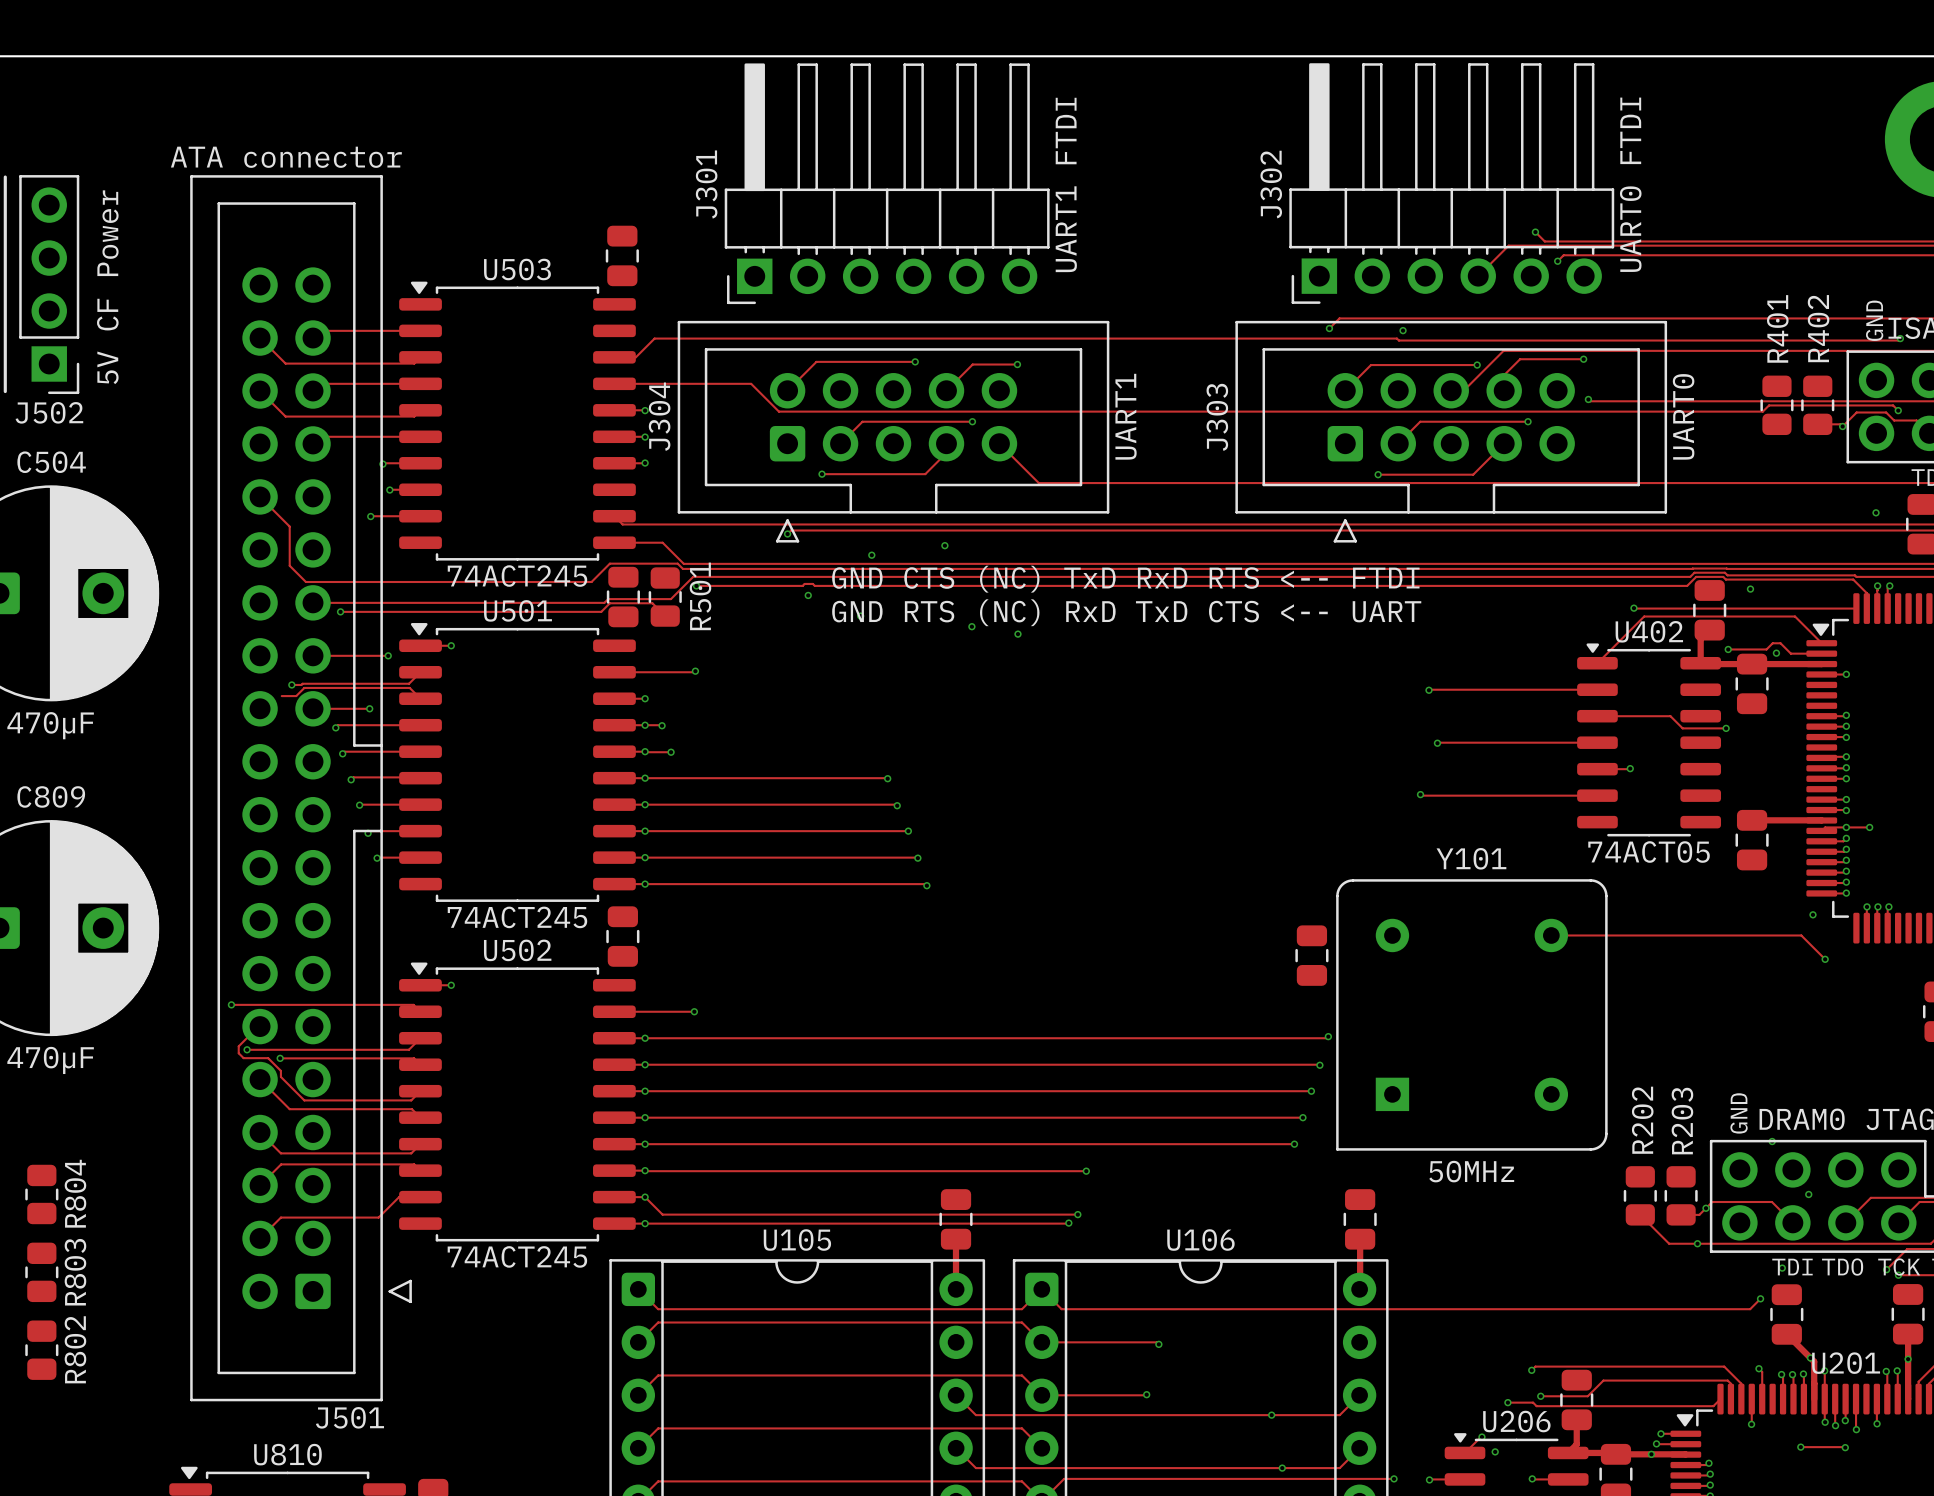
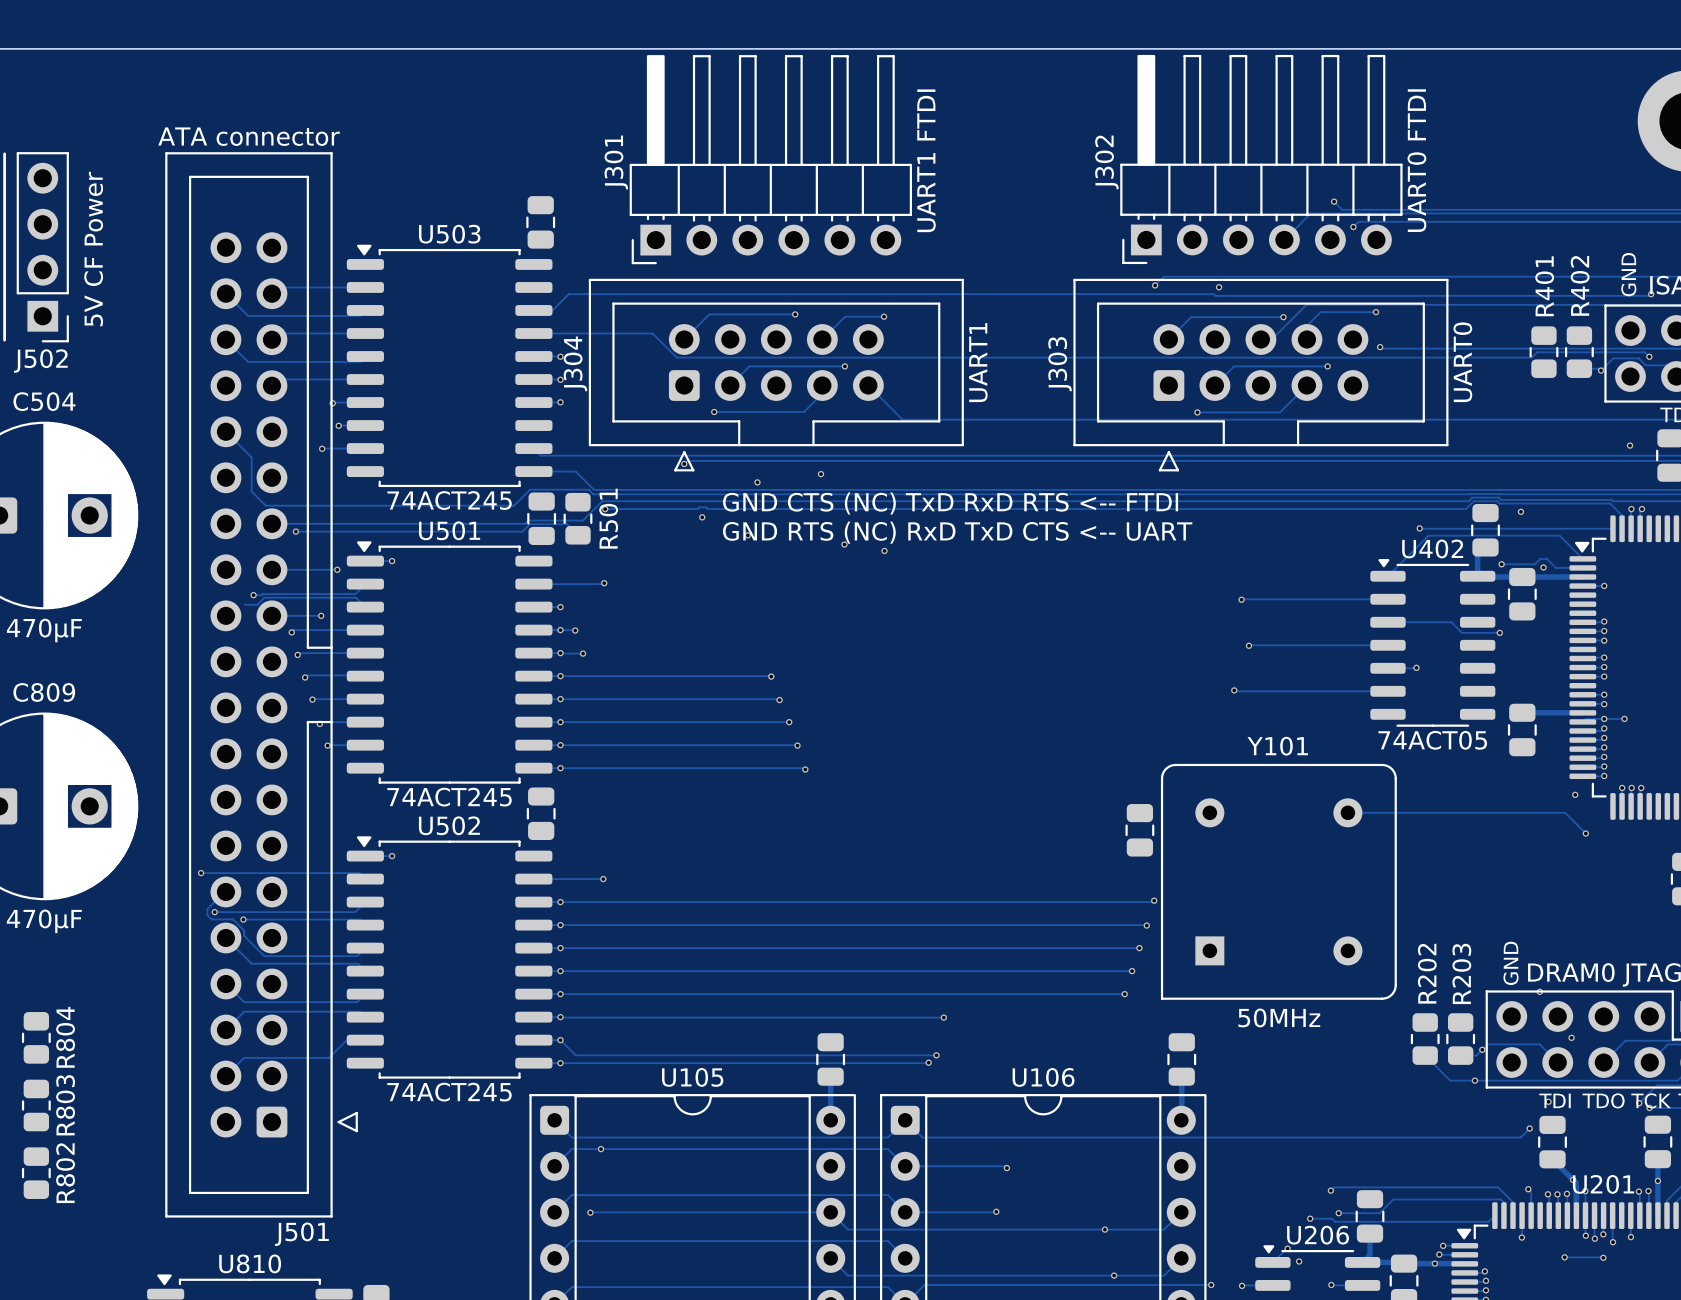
via: none -> (601, 1149)
via: none -> (590, 1212)
track: none -> (830, 1212) (590, 1212)

